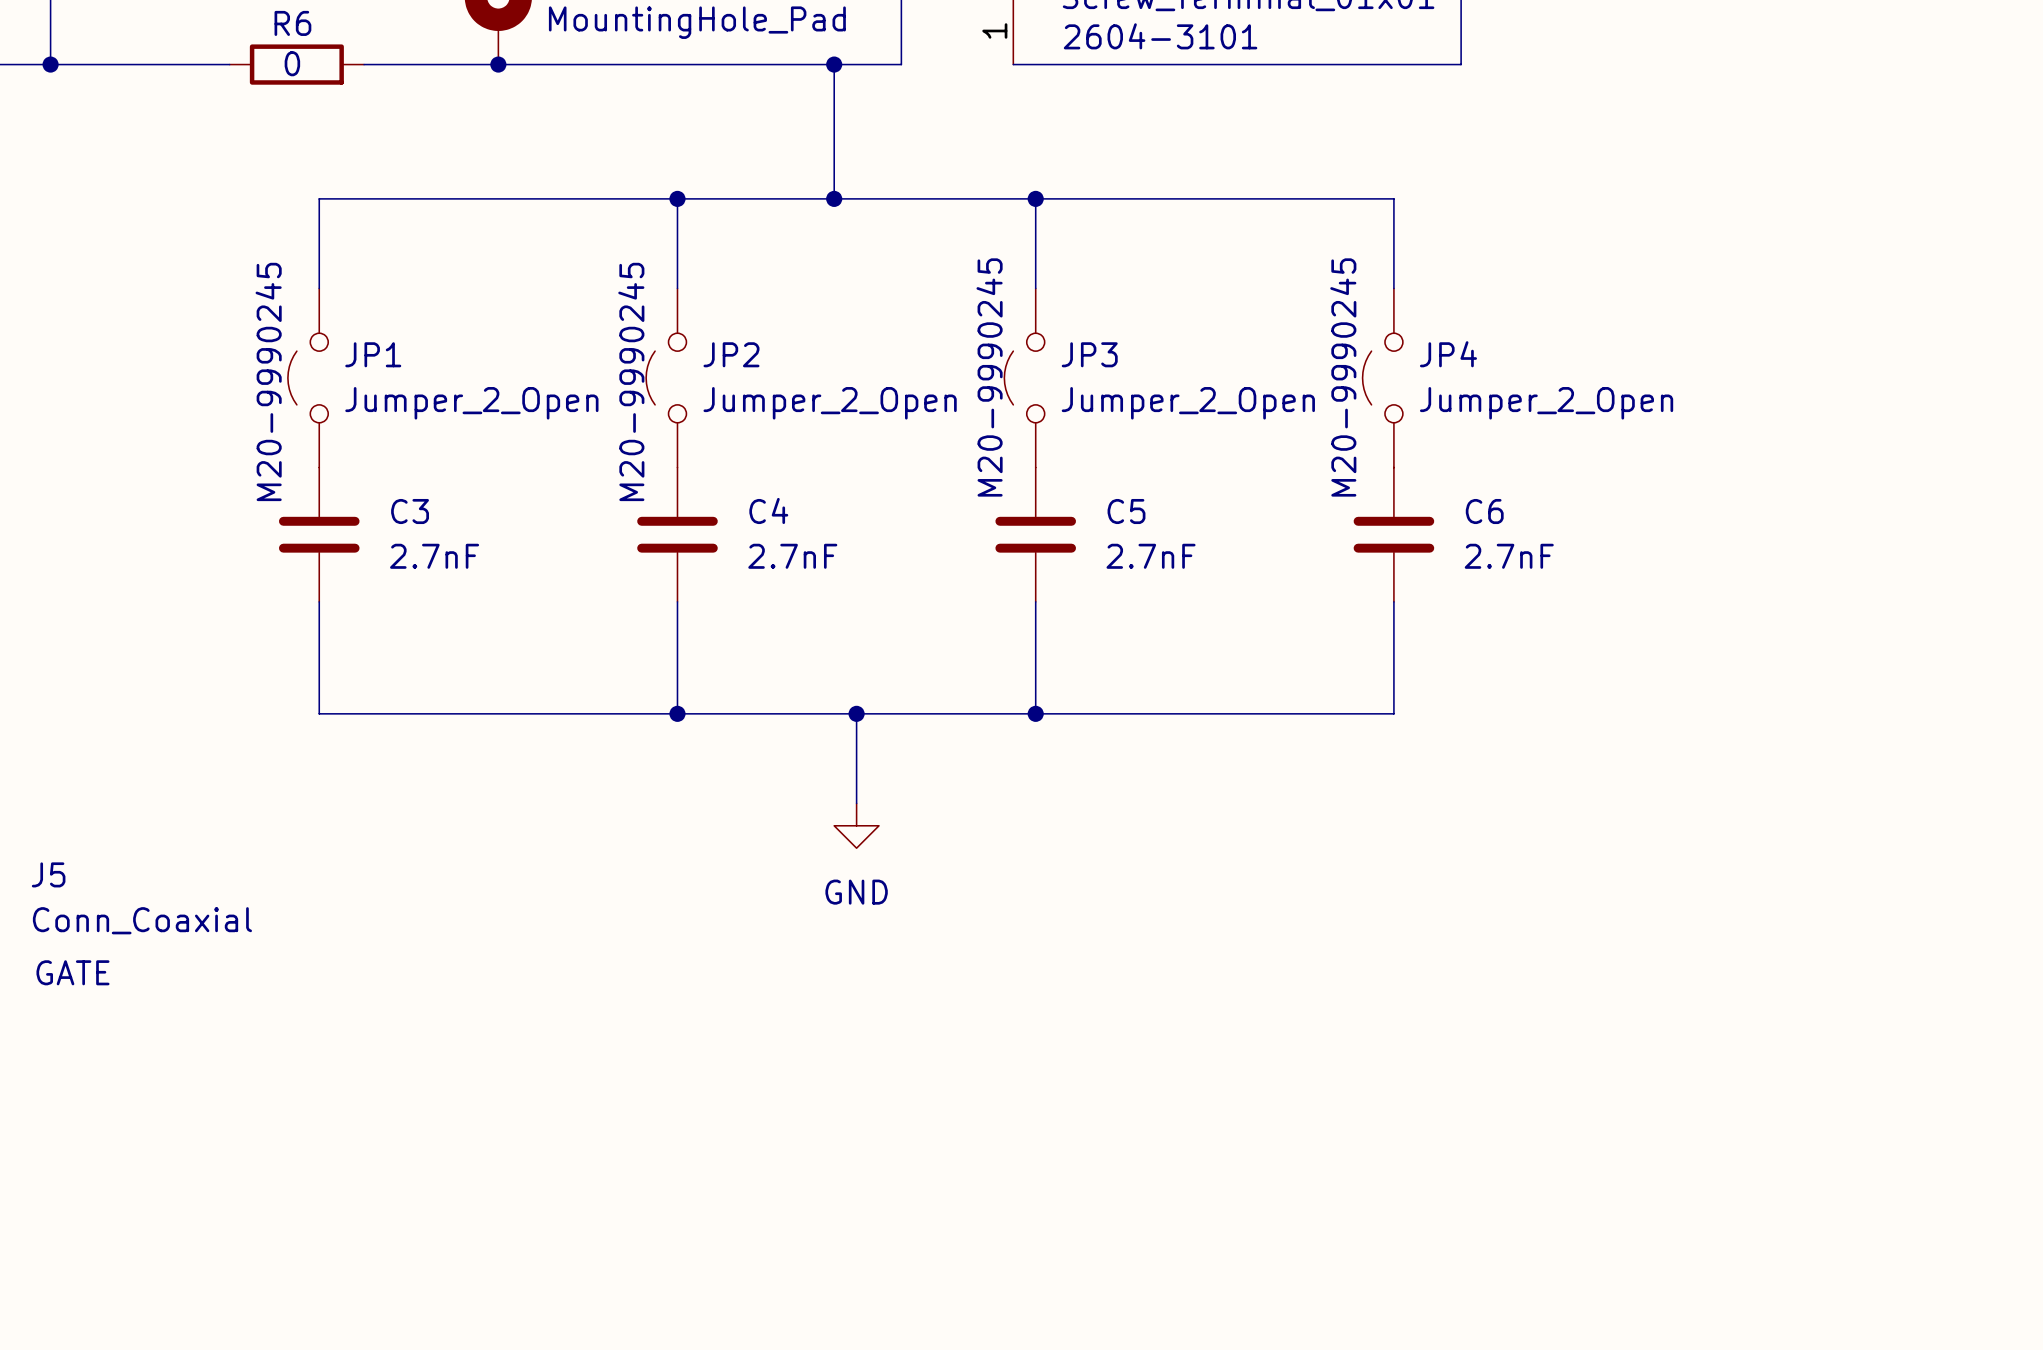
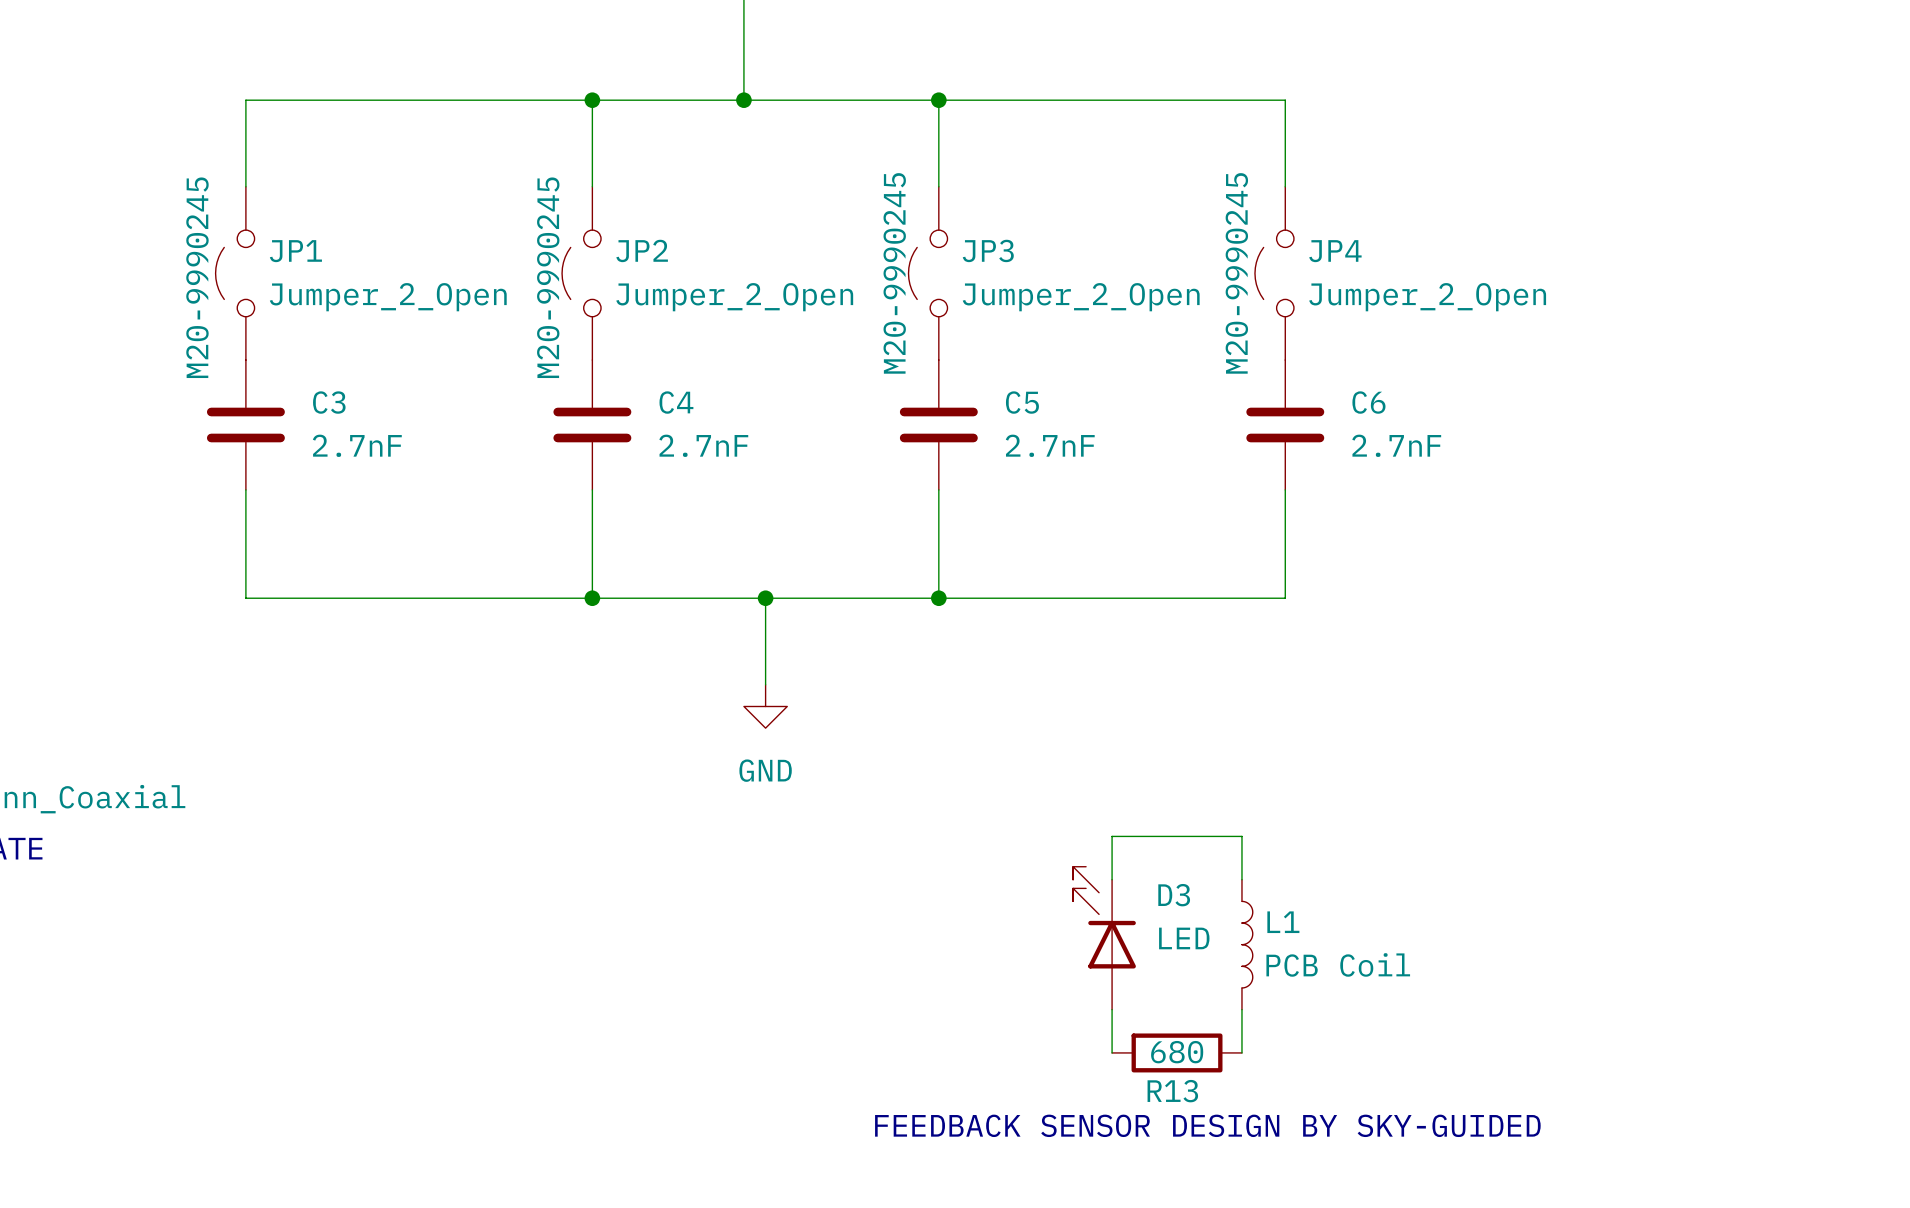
wire: none -> (1112, 879) (1112, 836) (1241, 836) (1241, 879)
D3: none -> LED (1104, 938)
L1: none -> PCB Coil (1247, 944)
wire: none -> (1112, 1009) (1112, 1052)
wire: none -> (1241, 1009) (1241, 1052)
R13: none -> 680 (1177, 1052)
text: none -> FEEDBACK SENSOR DESIGN BY SKY-GUIDED (1207, 1125)

